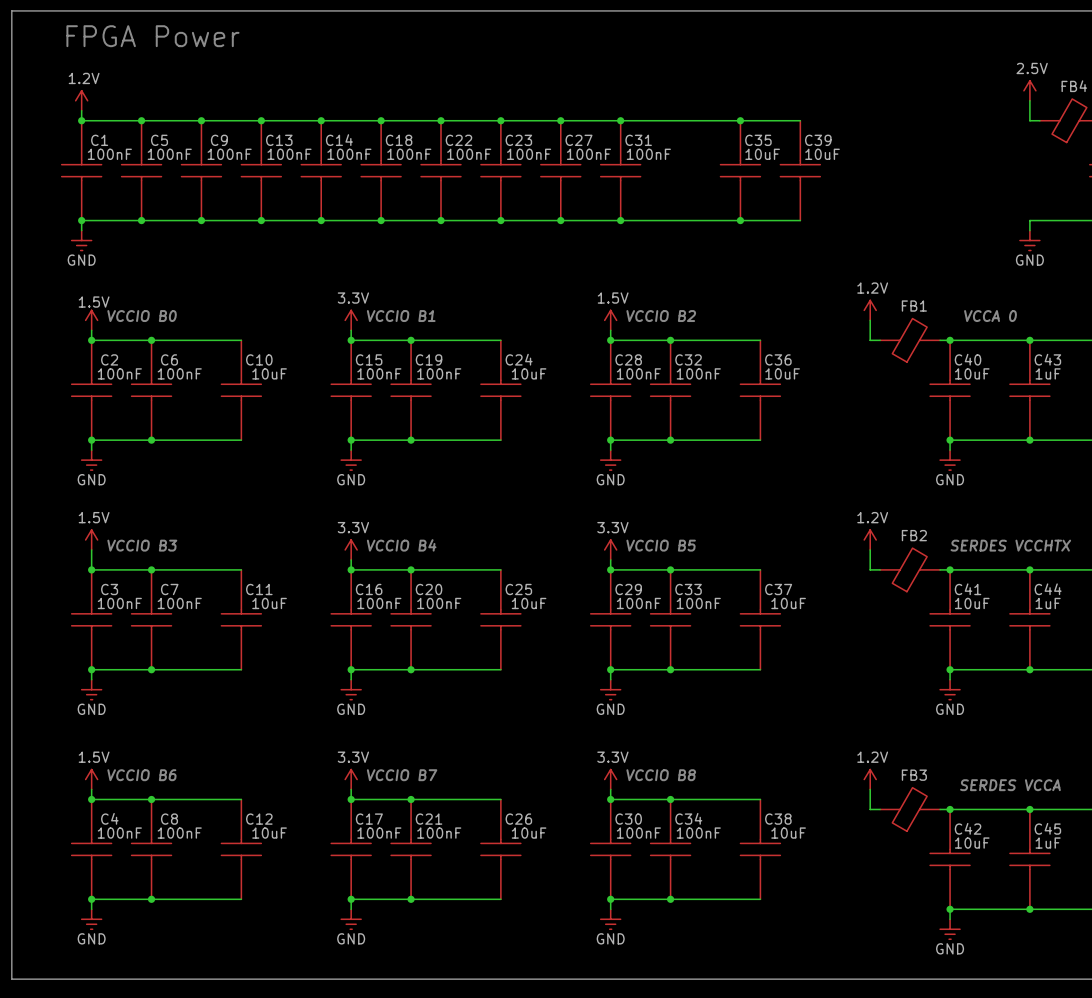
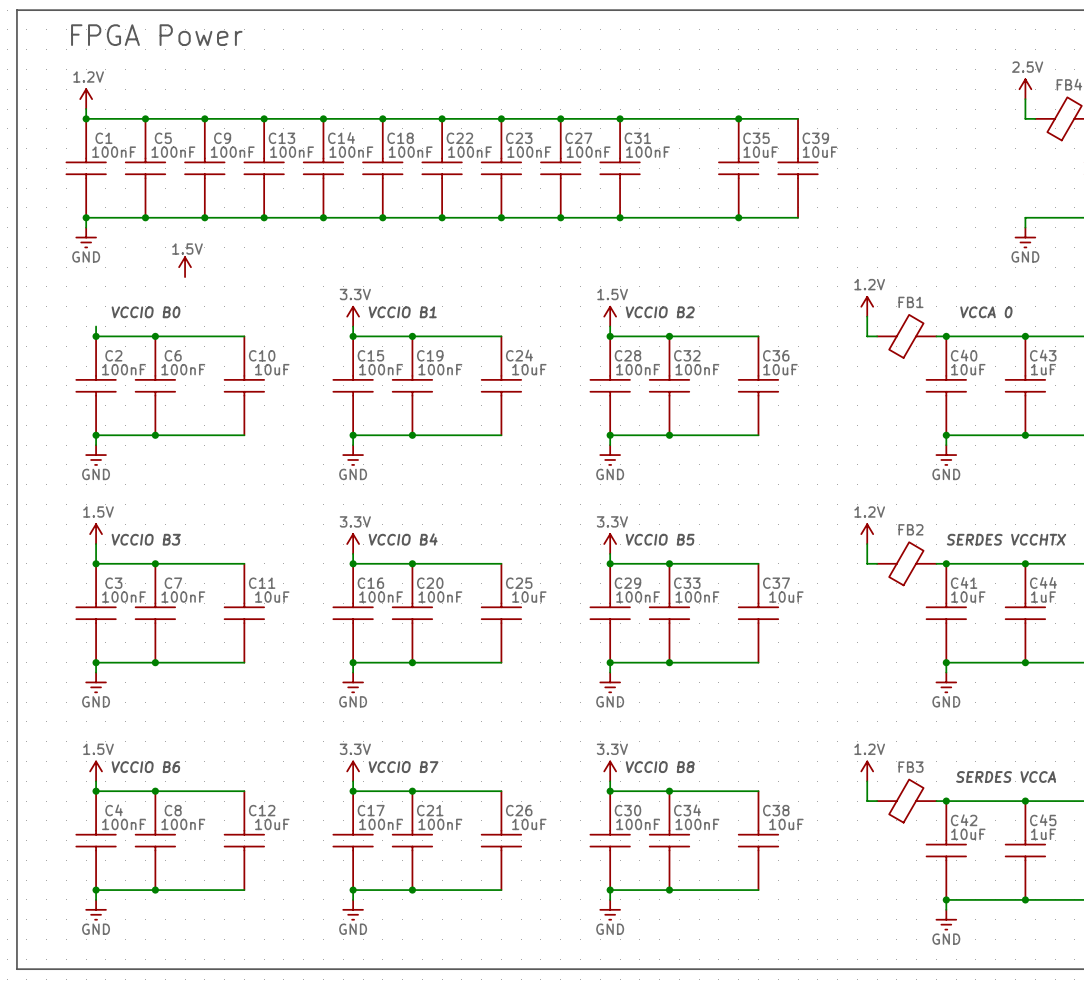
power symbol position: 1.5V (91, 320) -> 1.5V (185, 267)

